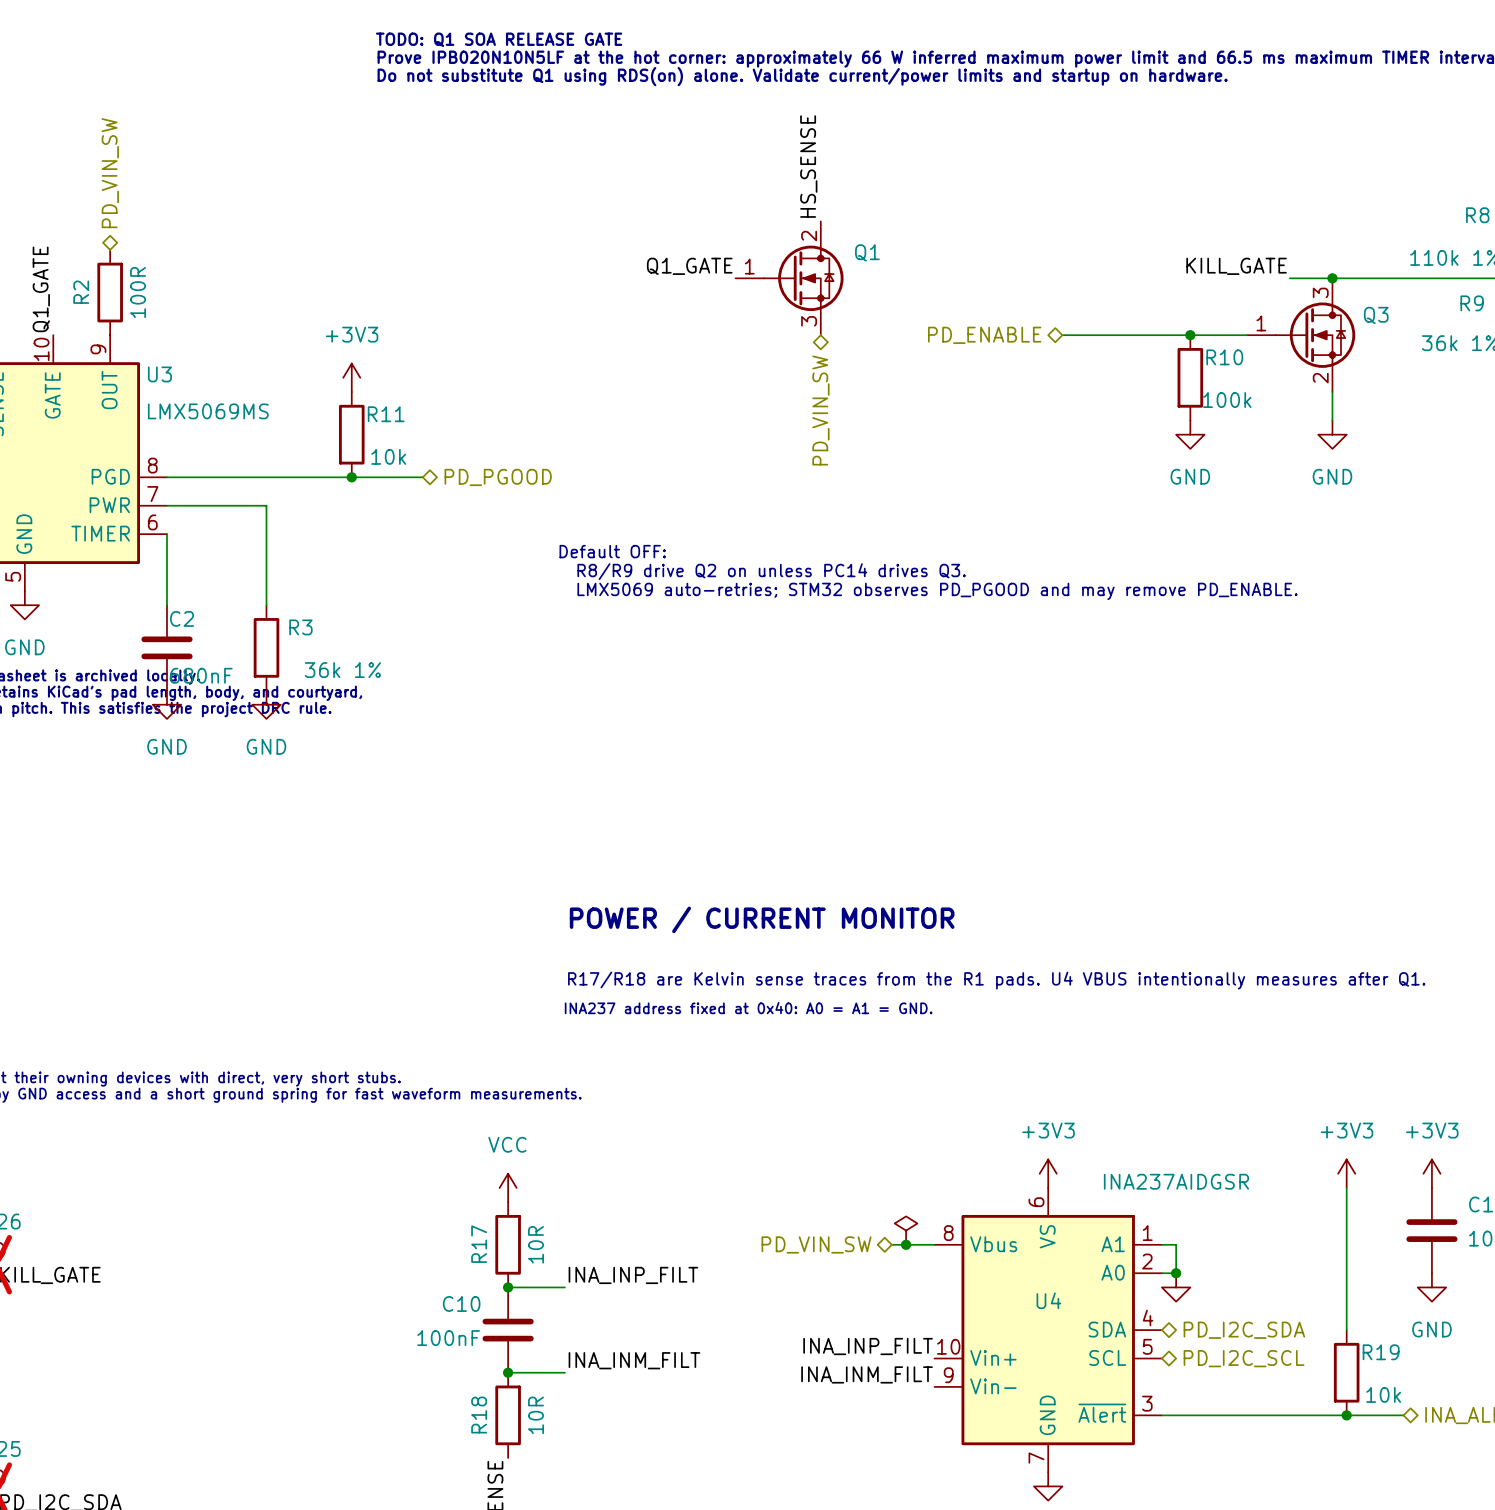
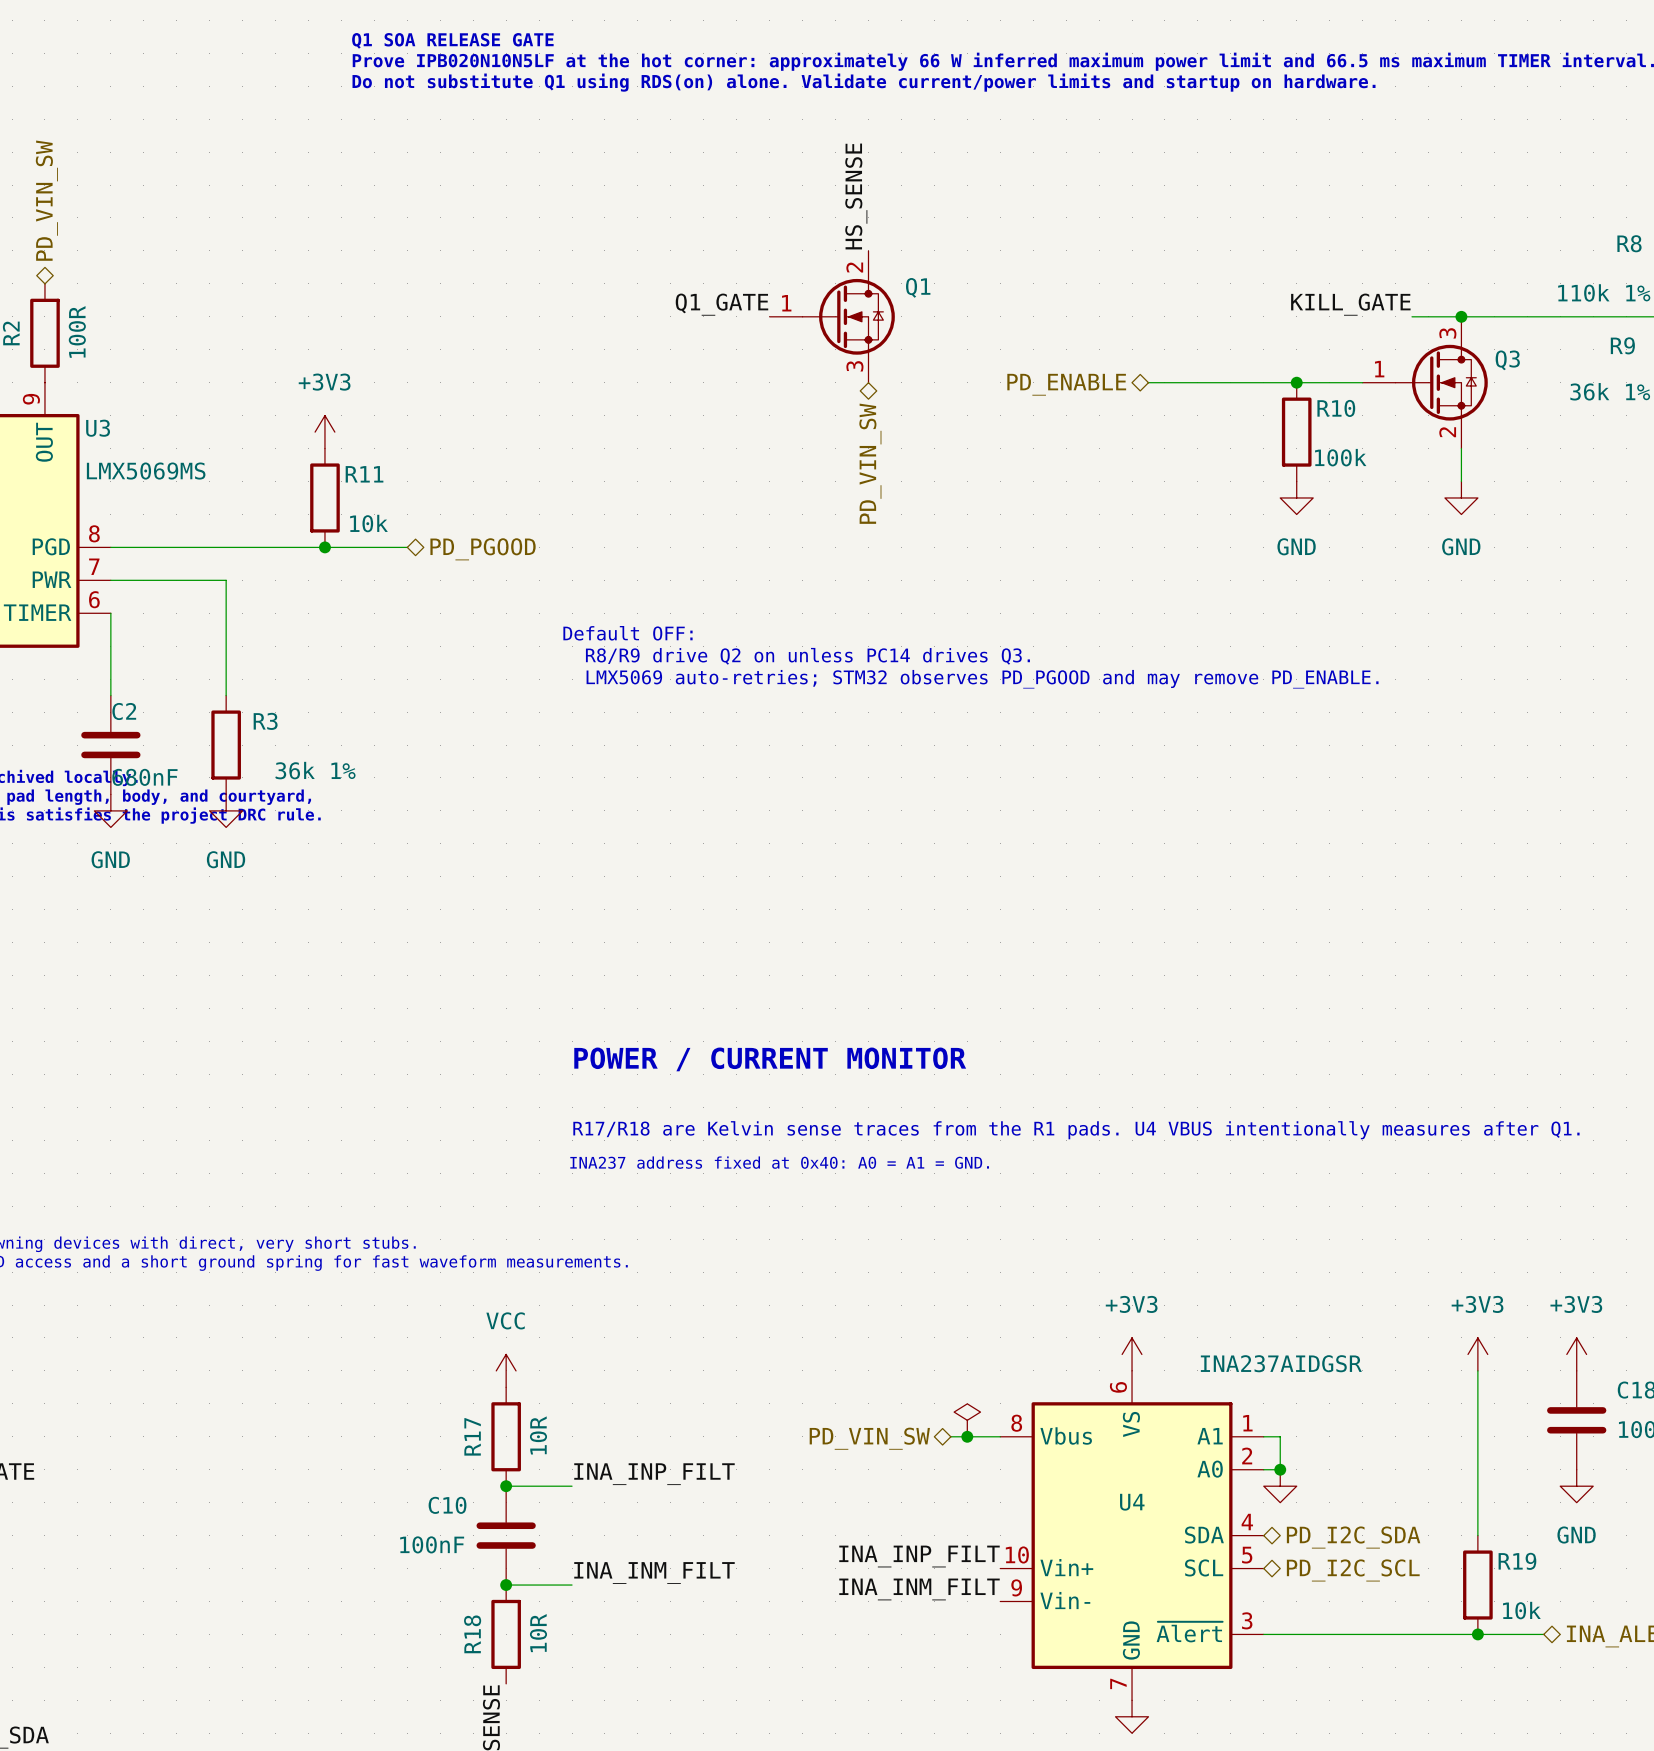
text: TODO: Q1 SOA RELEASE GATE (499, 39) -> Q1 SOA RELEASE GATE (452, 40)

